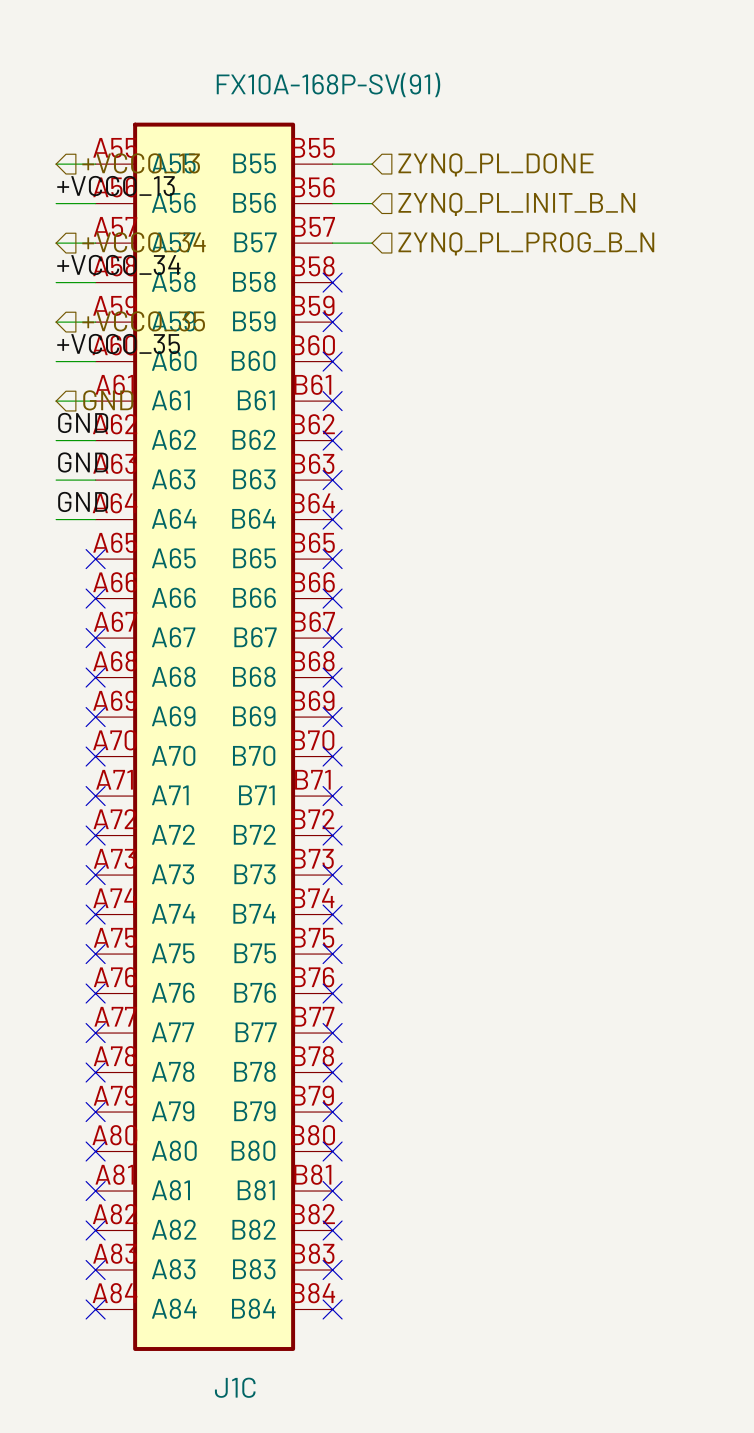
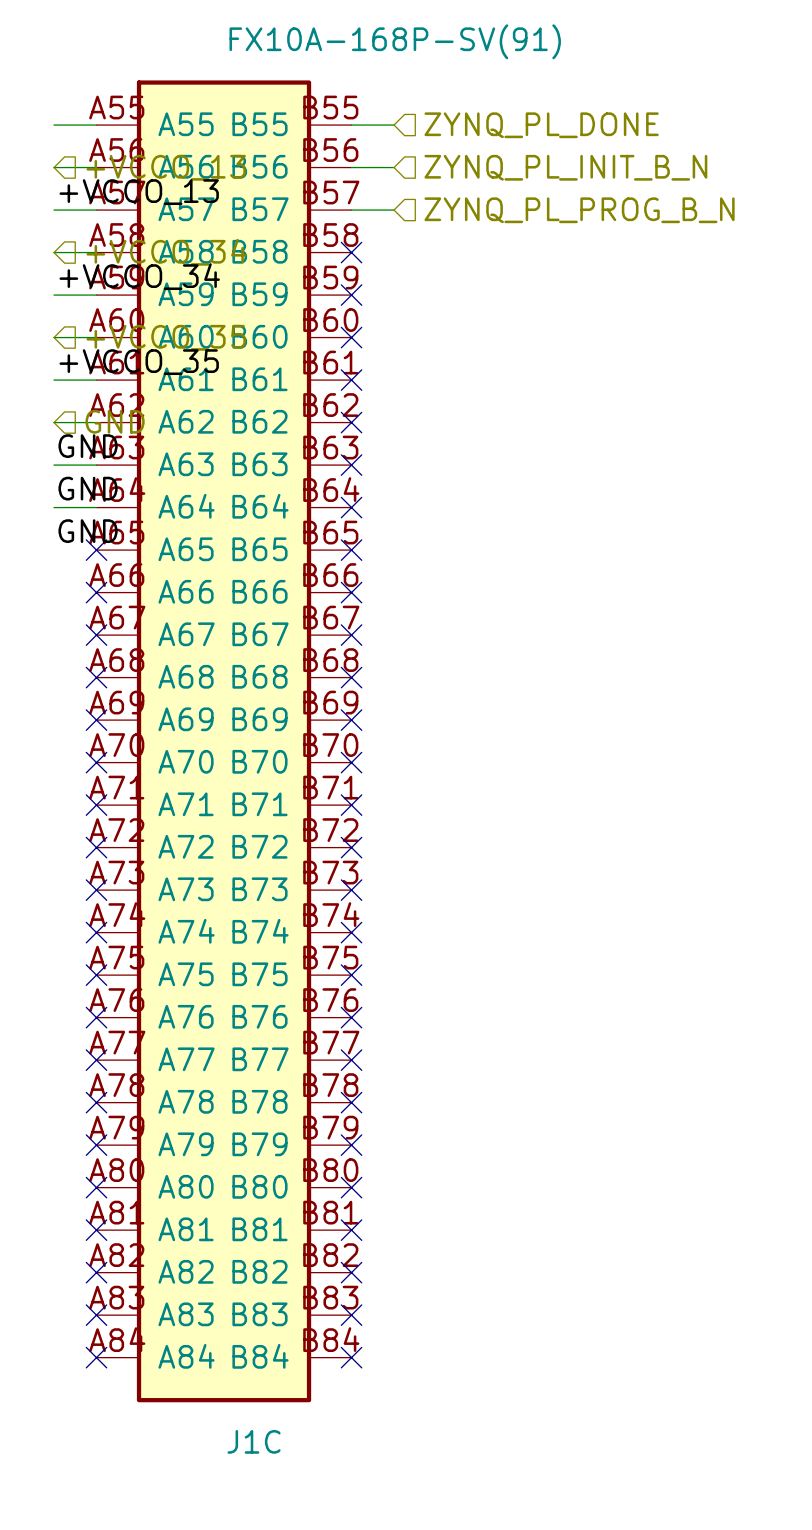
wire: none -> (54, 125) (96, 125)
hierarchical label: none -> ZYNQ_PL_DONE (541, 125)
hierarchical label: ZYNQ_PL_DONE (495, 164) -> ZYNQ_PL_INIT_B_N (565, 167)
hierarchical label: ZYNQ_PL_INIT_B_N (516, 204) -> ZYNQ_PL_PROG_B_N (579, 210)
wire: (332, 243) (372, 243) -> (351, 125) (394, 125)
no-connect mark: none -> (351, 252)
hierarchical label: ZYNQ_PL_PROG_B_N (526, 243) -> none
wire: (56, 519) (95, 519) -> none
no-connect mark: none -> (96, 550)
J1C position: (214, 736) -> (224, 741)
no-connect mark: (95, 1309) -> none
no-connect mark: (332, 1309) -> none

